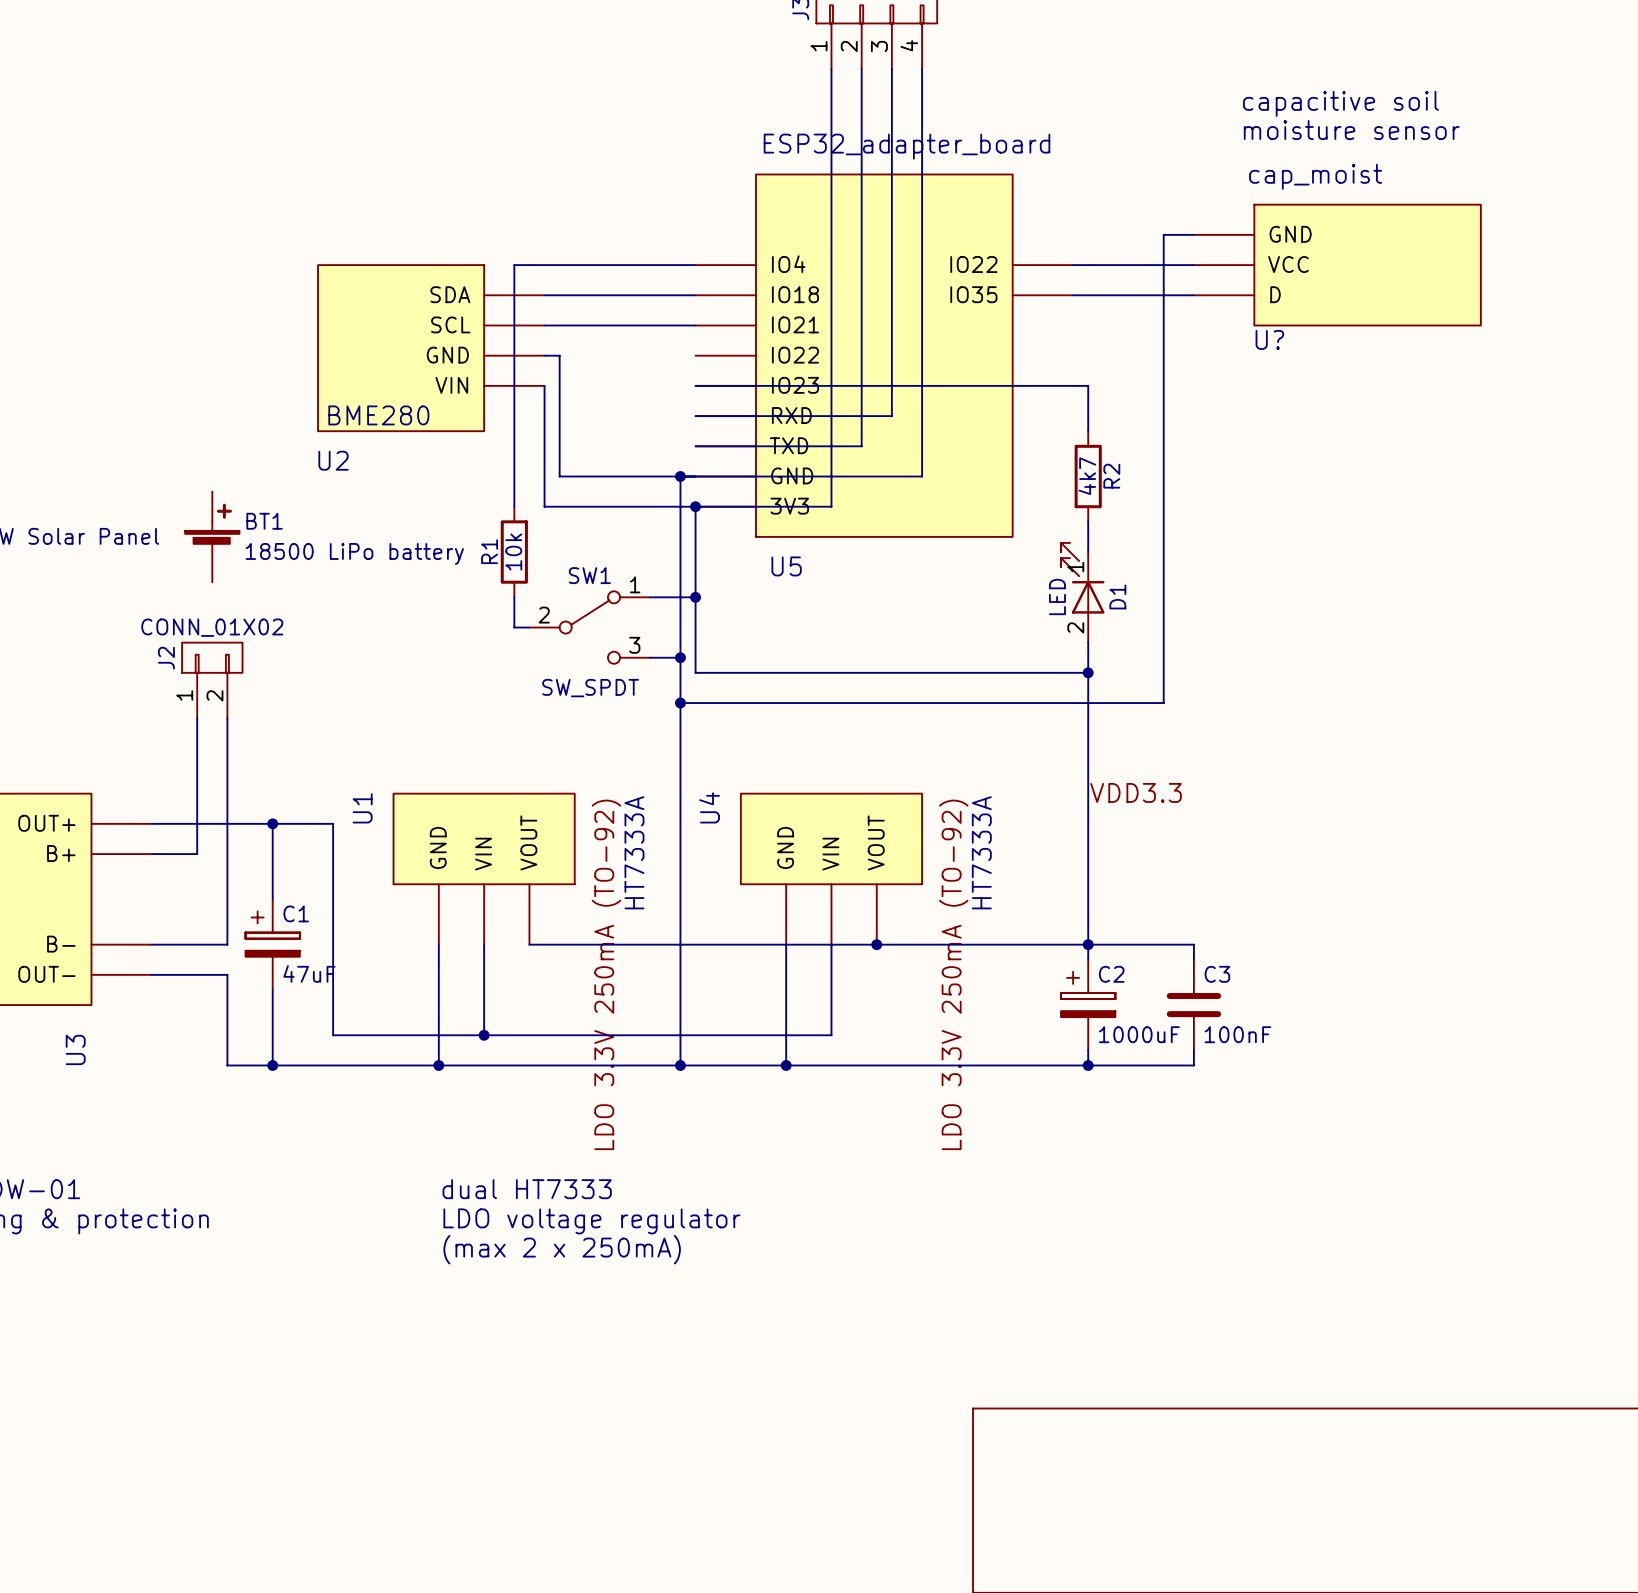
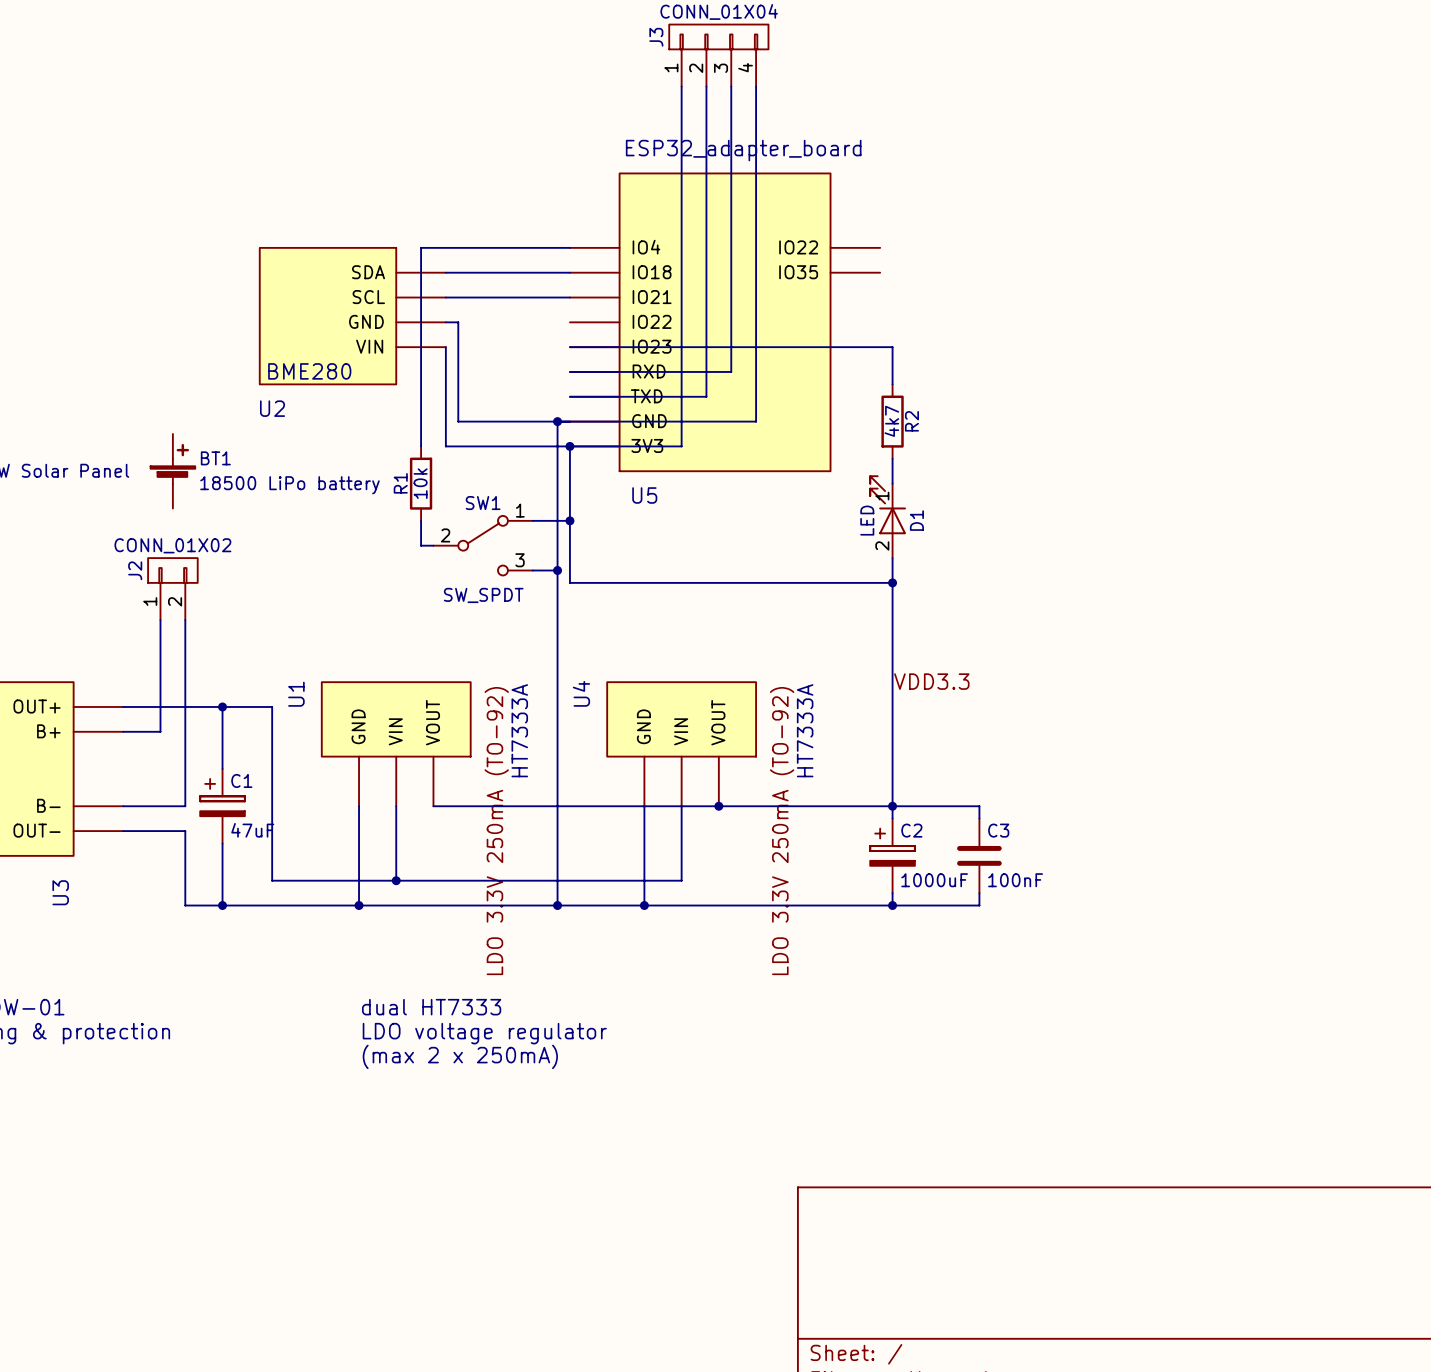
text: capacitive soil (1340, 103) -> none
text: moisture sensor (1351, 130) -> none
wire: (1193, 234) (1163, 234) (1163, 703) (680, 703) -> none
wire: (1073, 265) (1193, 265) -> none
U?: cap_moist (1337, 265) -> none
wire: (1073, 295) (1193, 295) -> none
junction: (680, 703) -> none

